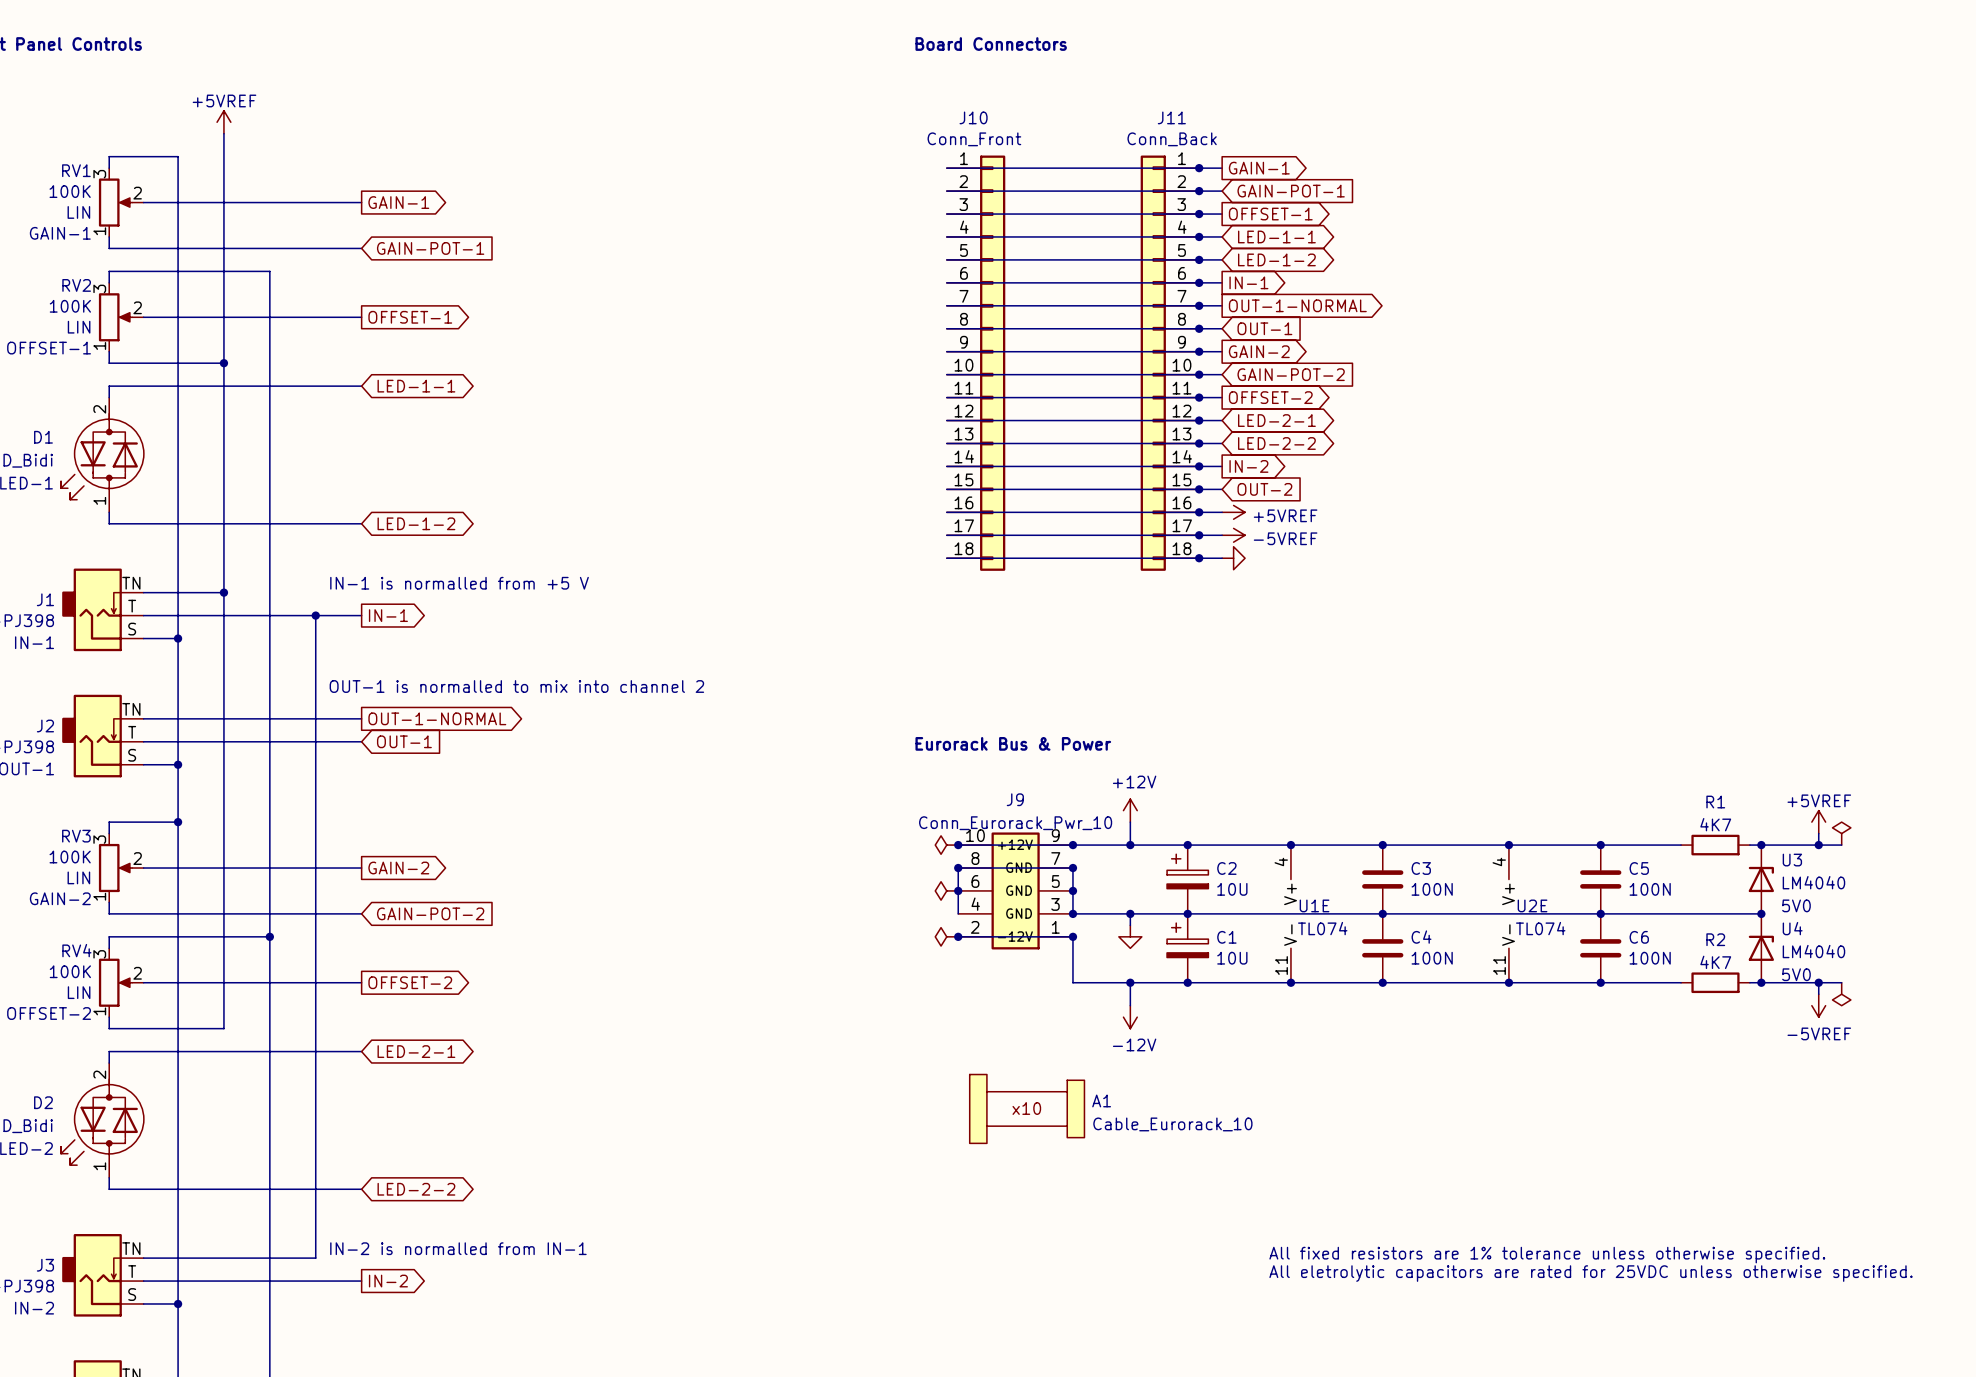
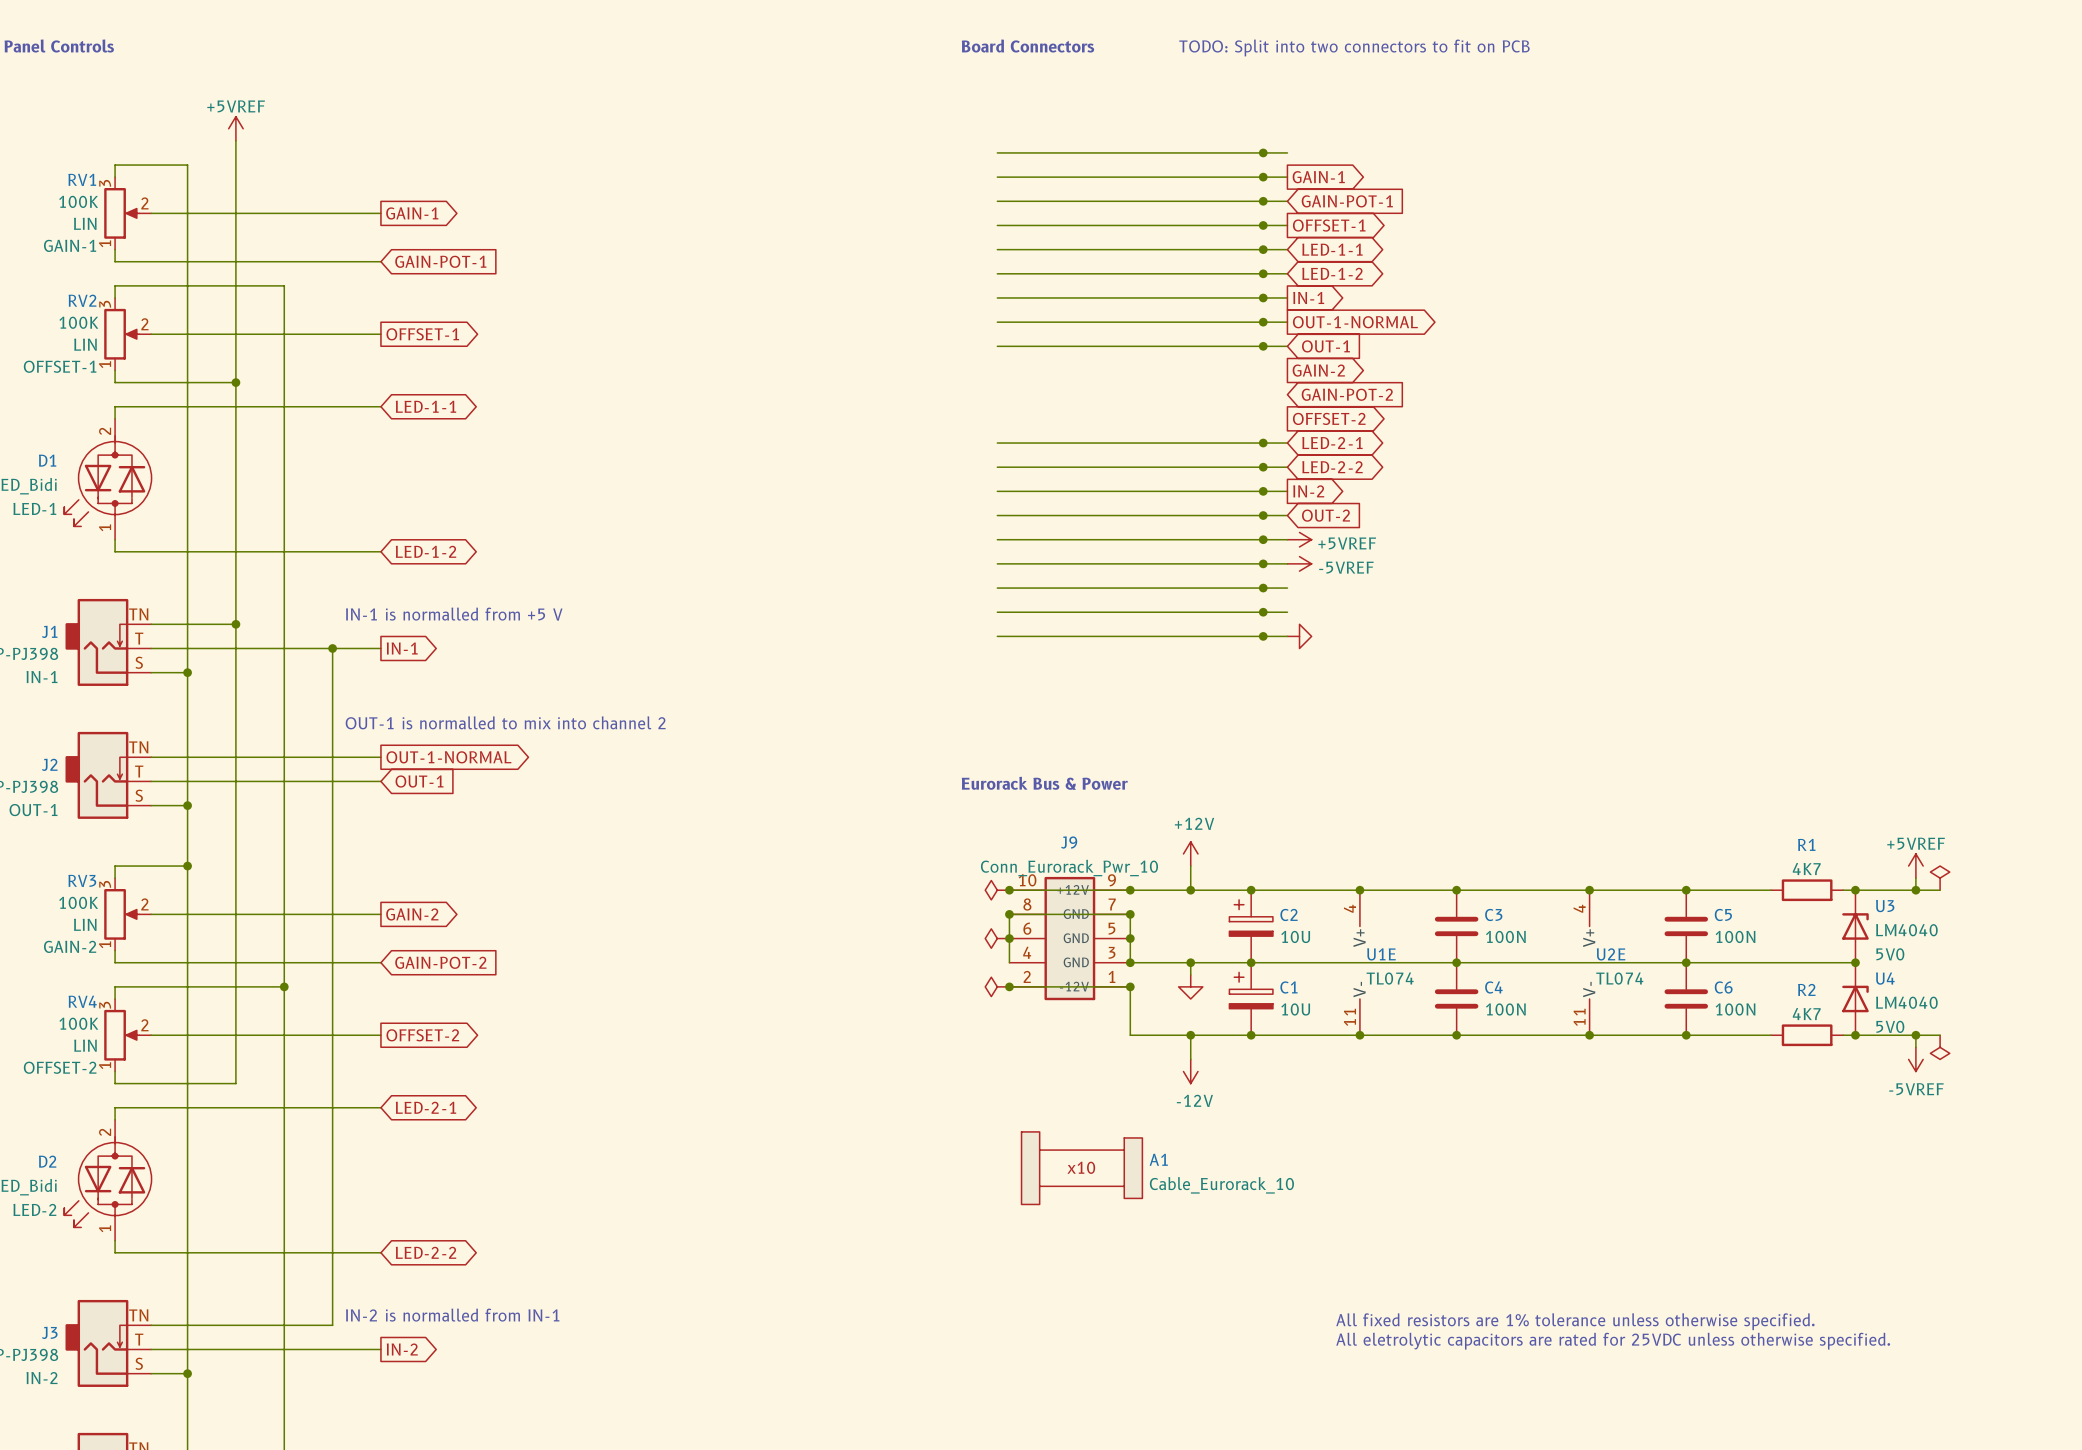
text: none -> TODO: Split into two connectors to fit on PCB (1354, 47)
junction: none -> (1263, 152)
wire: (946, 351) (1222, 351) -> (997, 152) (1287, 152)
junction: (1199, 351) -> none
J10: Conn_Front (976, 363) -> none
J11: Conn_Back (1169, 363) -> none
wire: (946, 374) (1222, 374) -> (997, 612) (1287, 612)
junction: (1199, 374) -> none
wire: (946, 397) (1222, 397) -> (997, 636) (1287, 636)
junction: (1199, 397) -> none
power symbol position: (1233, 558) -> (1299, 636)
junction: none -> (1263, 612)
junction: none -> (1263, 636)

